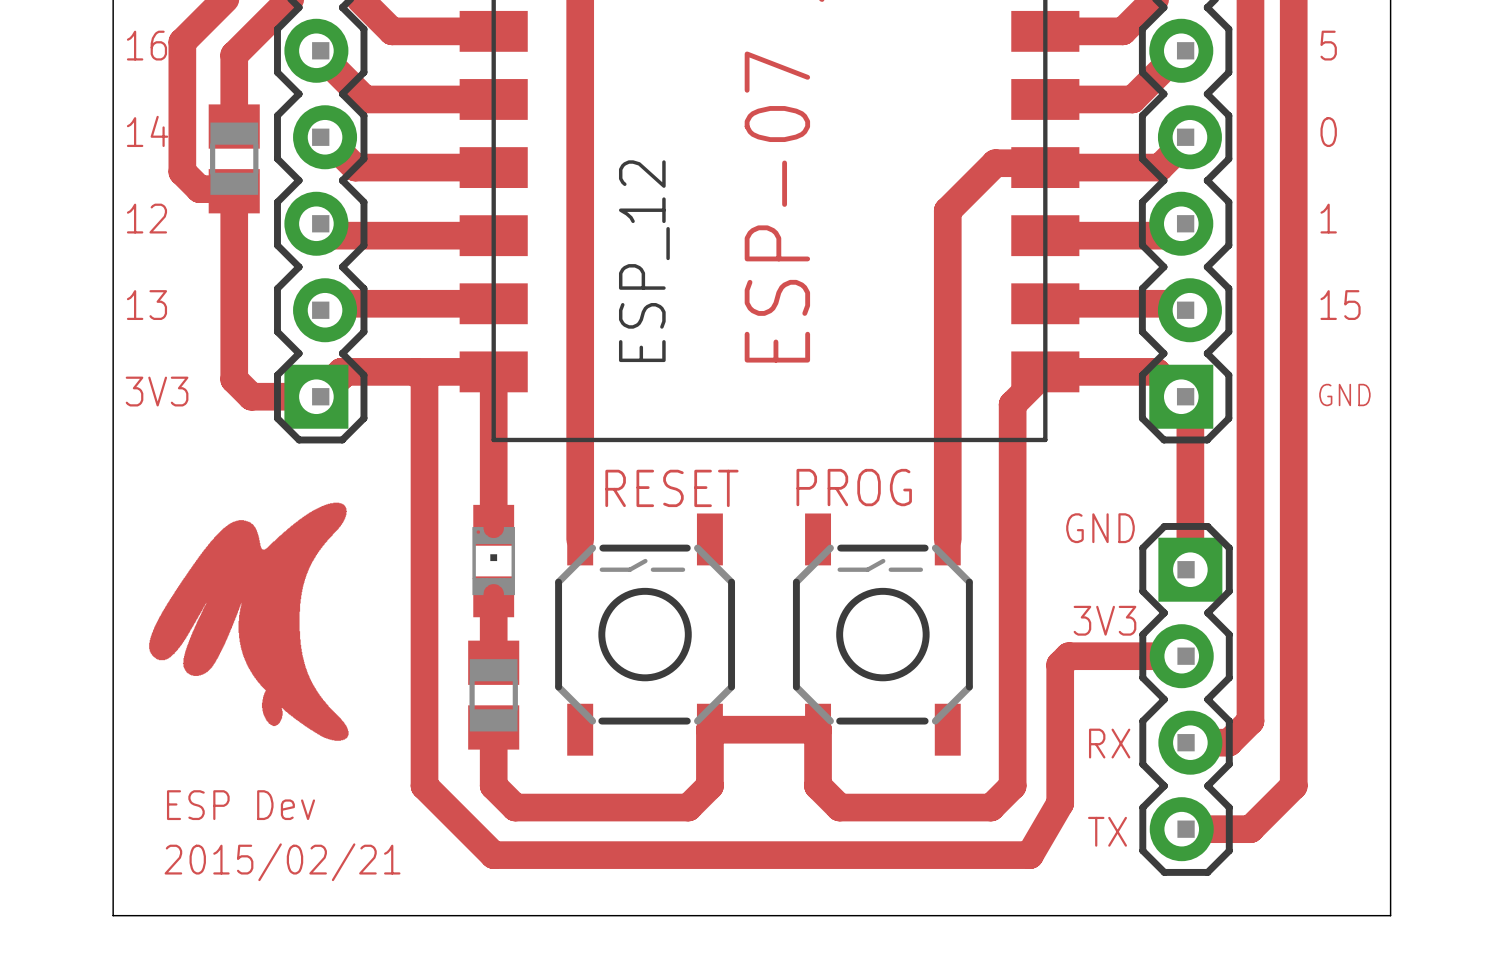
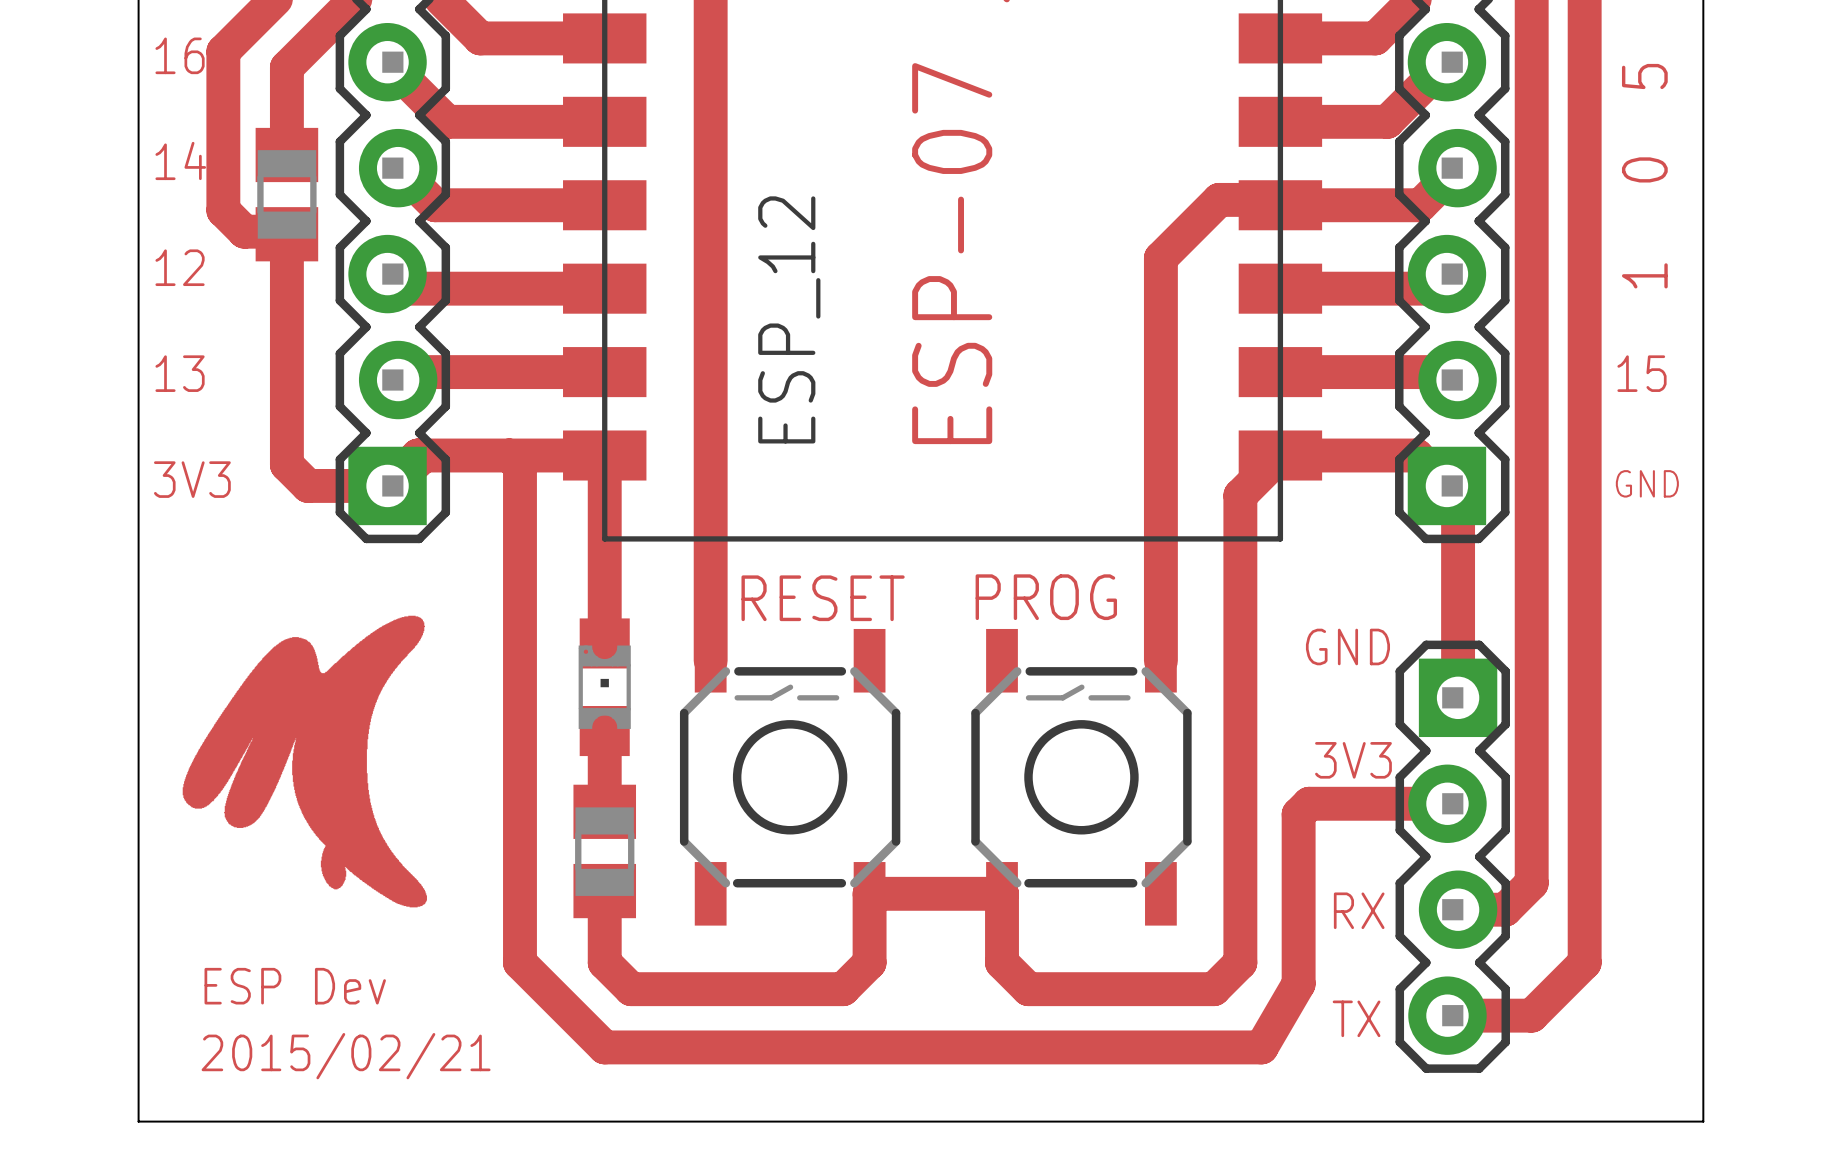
text rotation: 0° (1328, 45) -> 90° counterclockwise (1644, 76)
text rotation: 0° (1328, 132) -> 90° counterclockwise (1644, 169)
text rotation: 0° (1328, 218) -> 90° counterclockwise (1644, 275)

